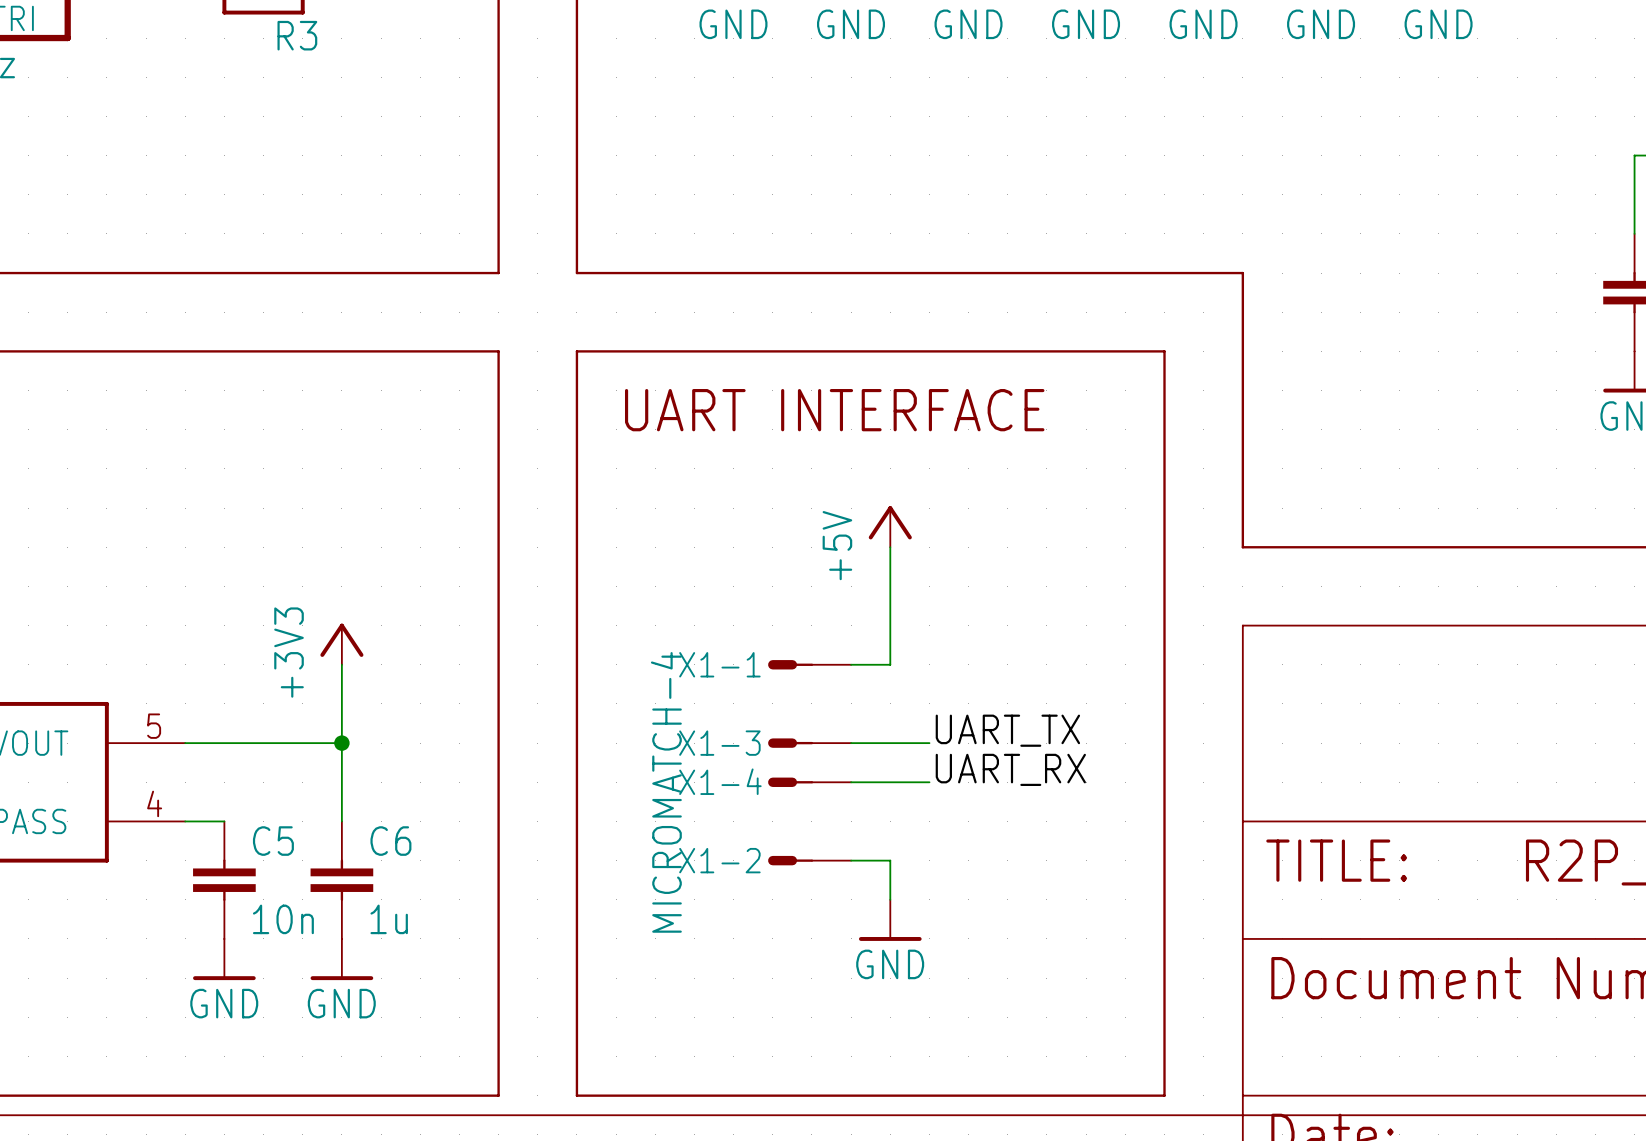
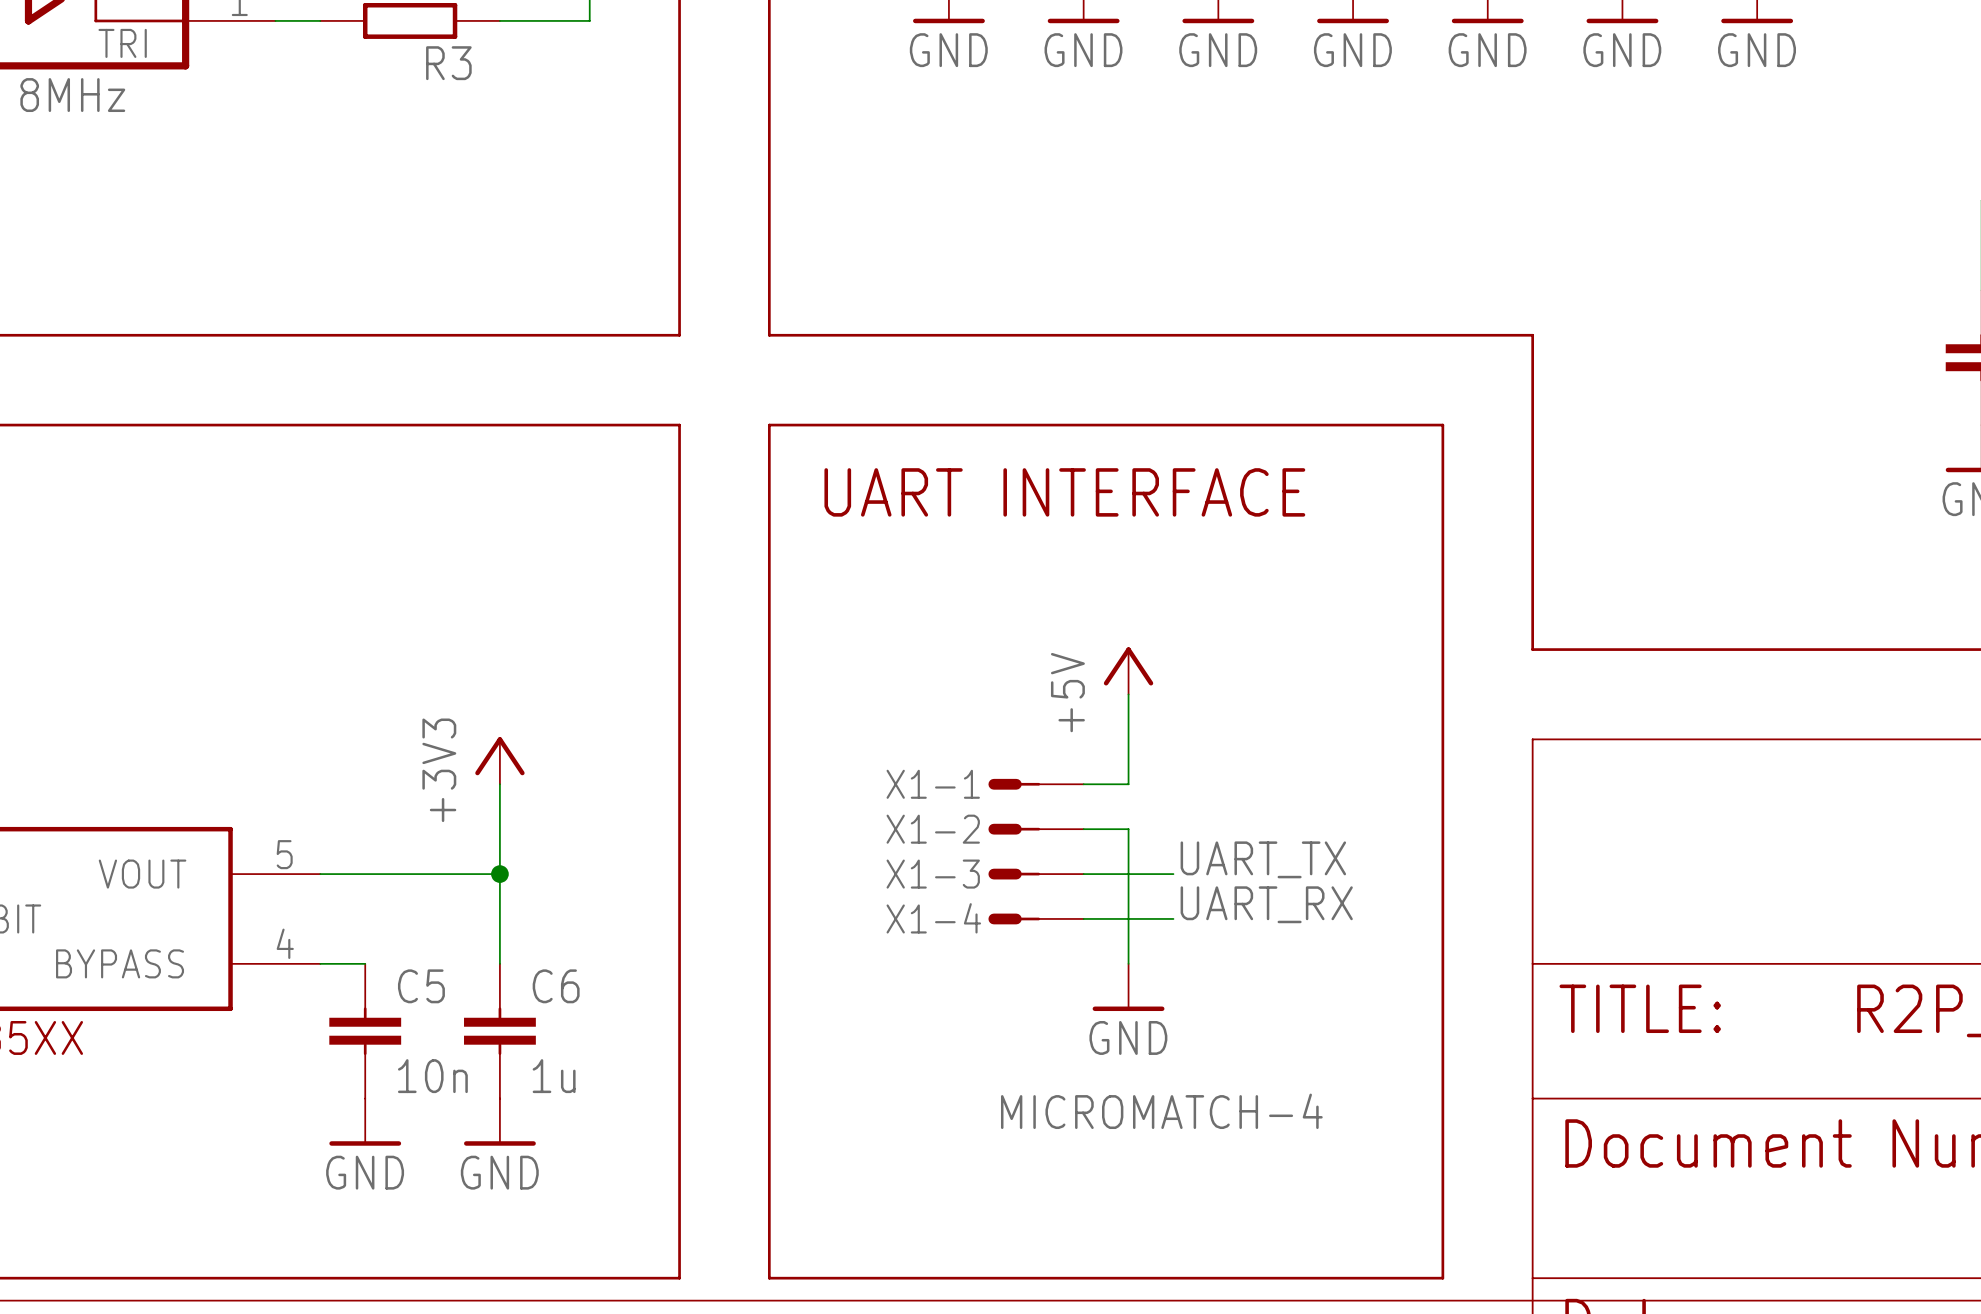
power symbol position: +5V (890, 526) -> +5V (1128, 670)
wire: none -> (1083, 829) (1128, 829) (1128, 963)
X1-1 value rotation: 0° (666, 792) -> 90° clockwise (1161, 1111)
X1-2 position: (809, 860) -> (1036, 829)
wire: (851, 860) (890, 860) (890, 899) -> none
power symbol position: GND (890, 920) -> GND (1128, 987)

